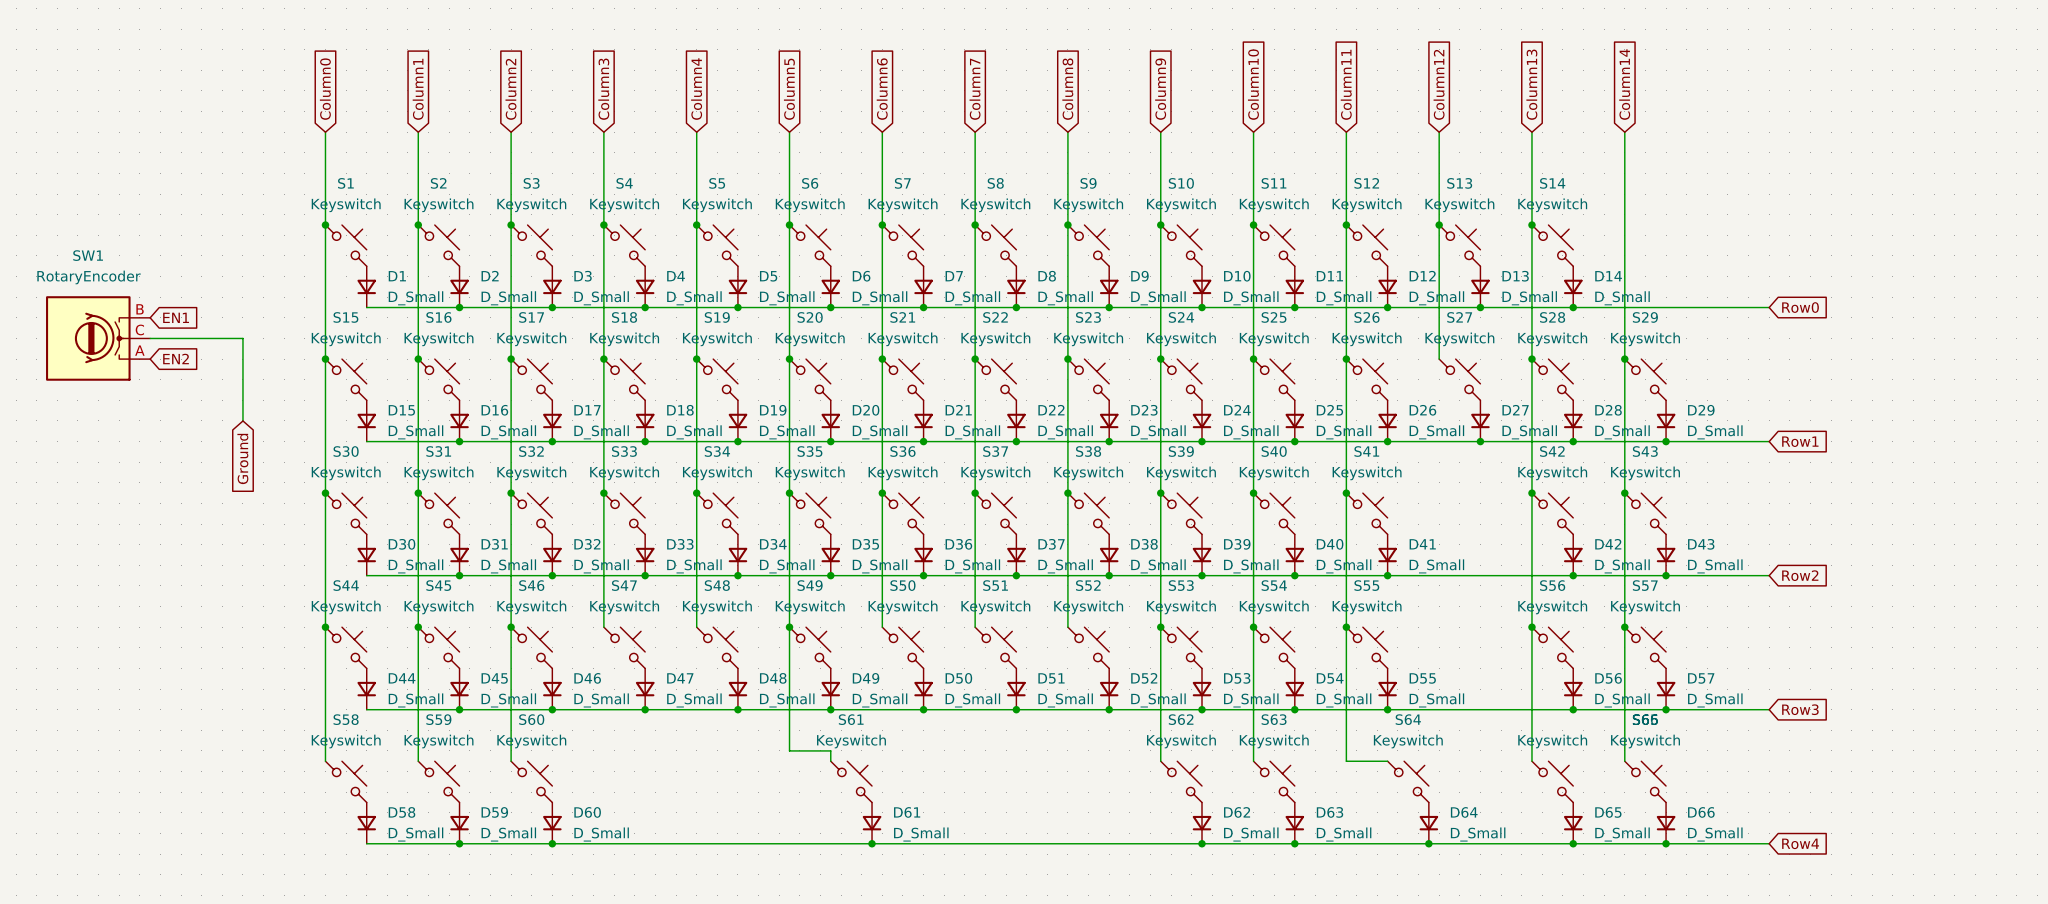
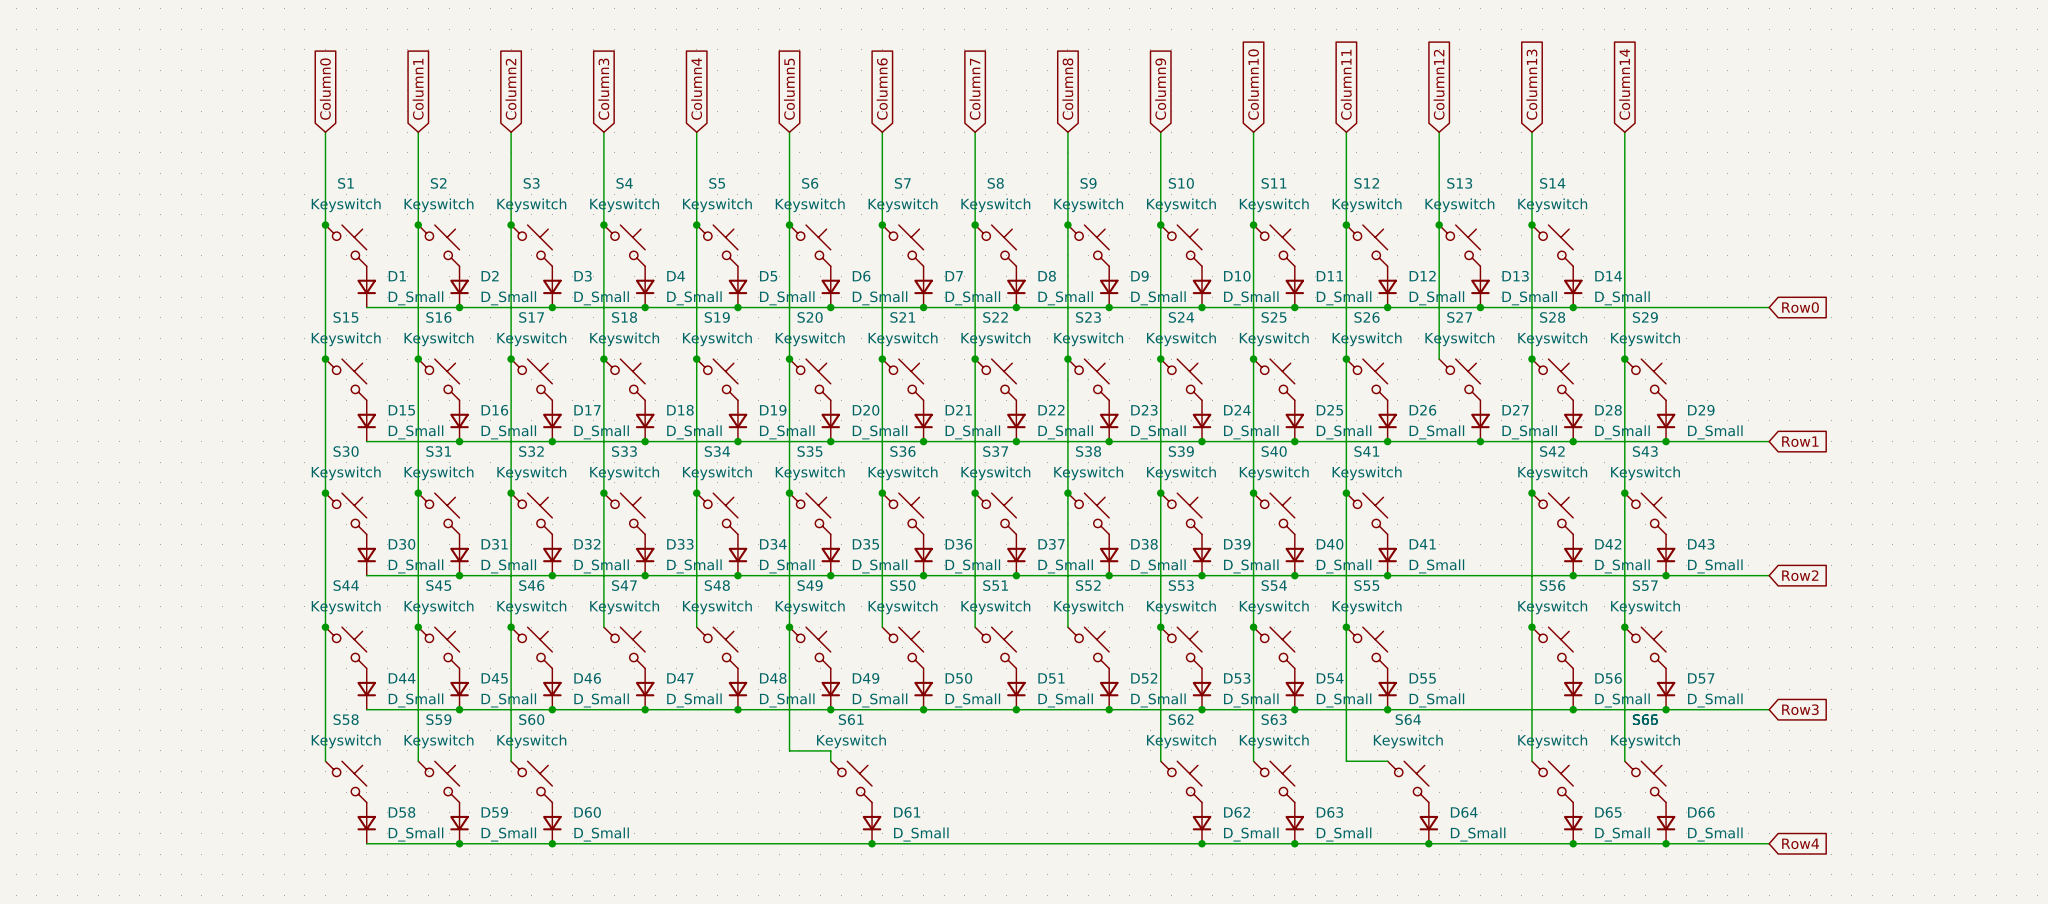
global label: EN1 (176, 317) -> none
SW1: RotaryEncoder (98, 338) -> none
wire: (150, 338) (242, 338) (242, 420) -> none
global label: EN2 (176, 359) -> none
global label: Ground (242, 458) -> none

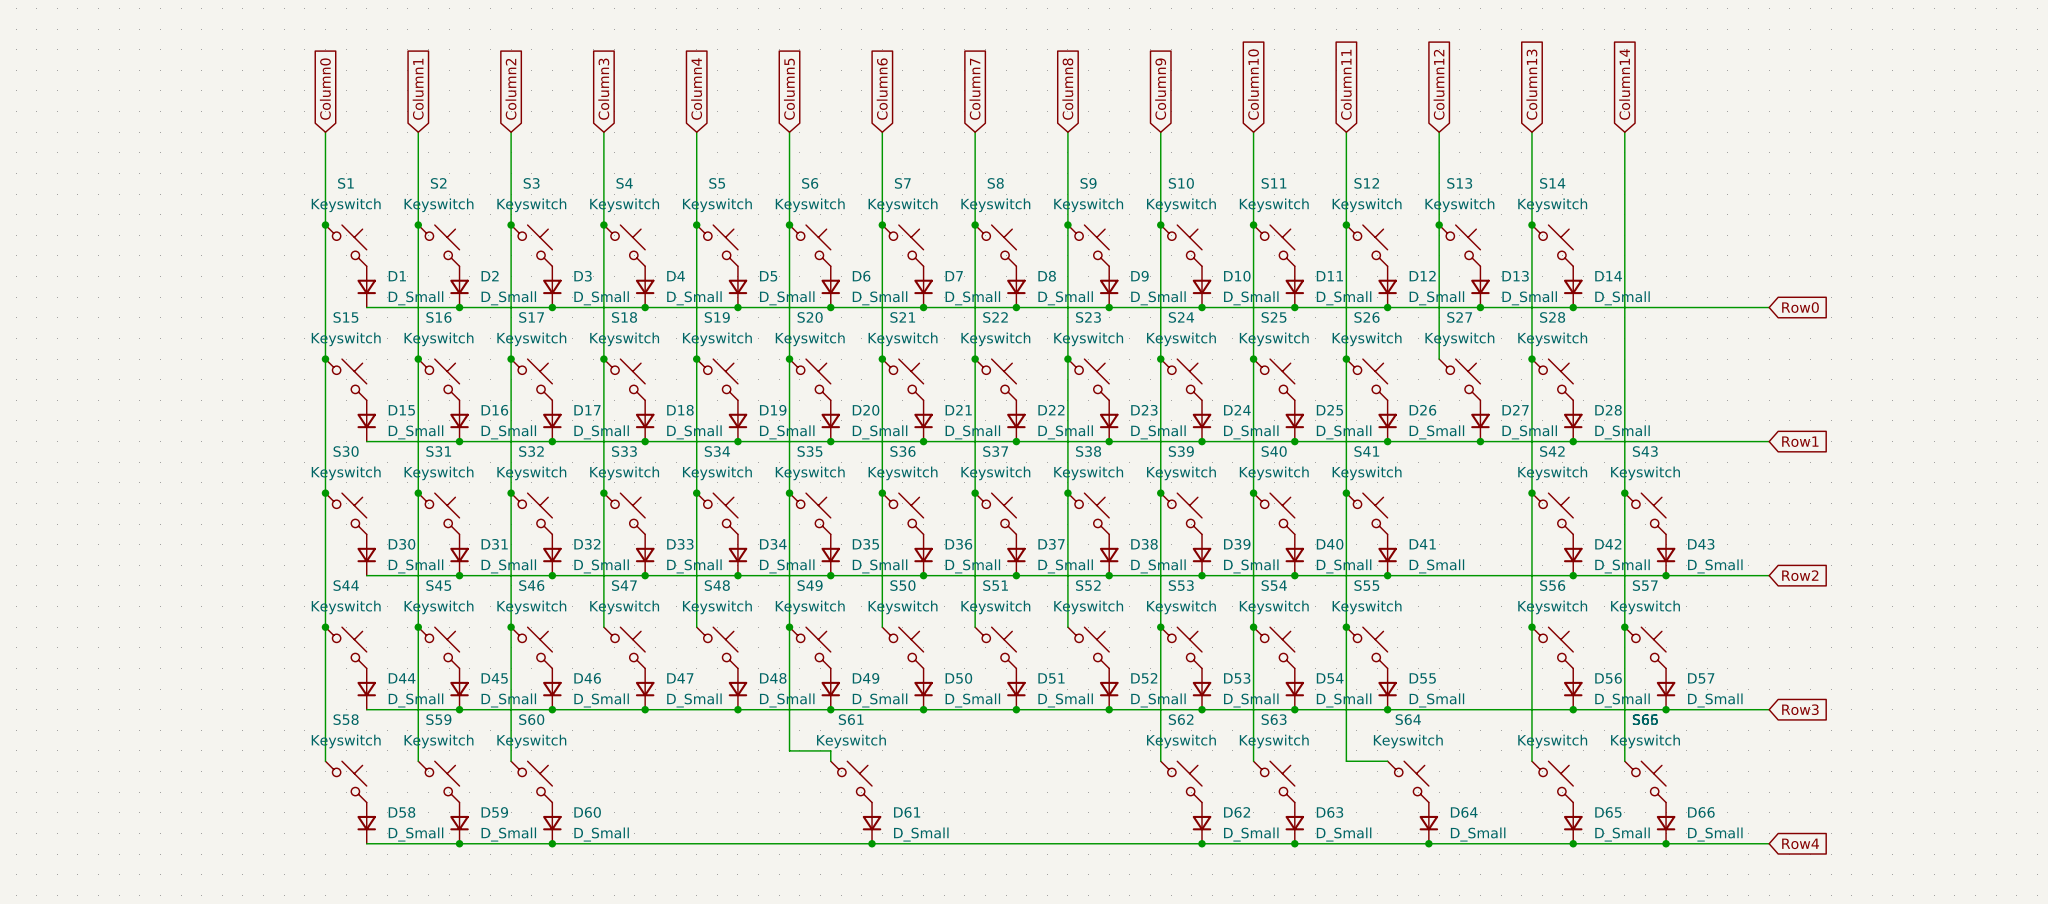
junction: (1624, 359) -> none
S29: Keyswitch (1645, 379) -> none
D29: D_Small (1666, 420) -> none
junction: (1666, 441) -> none

